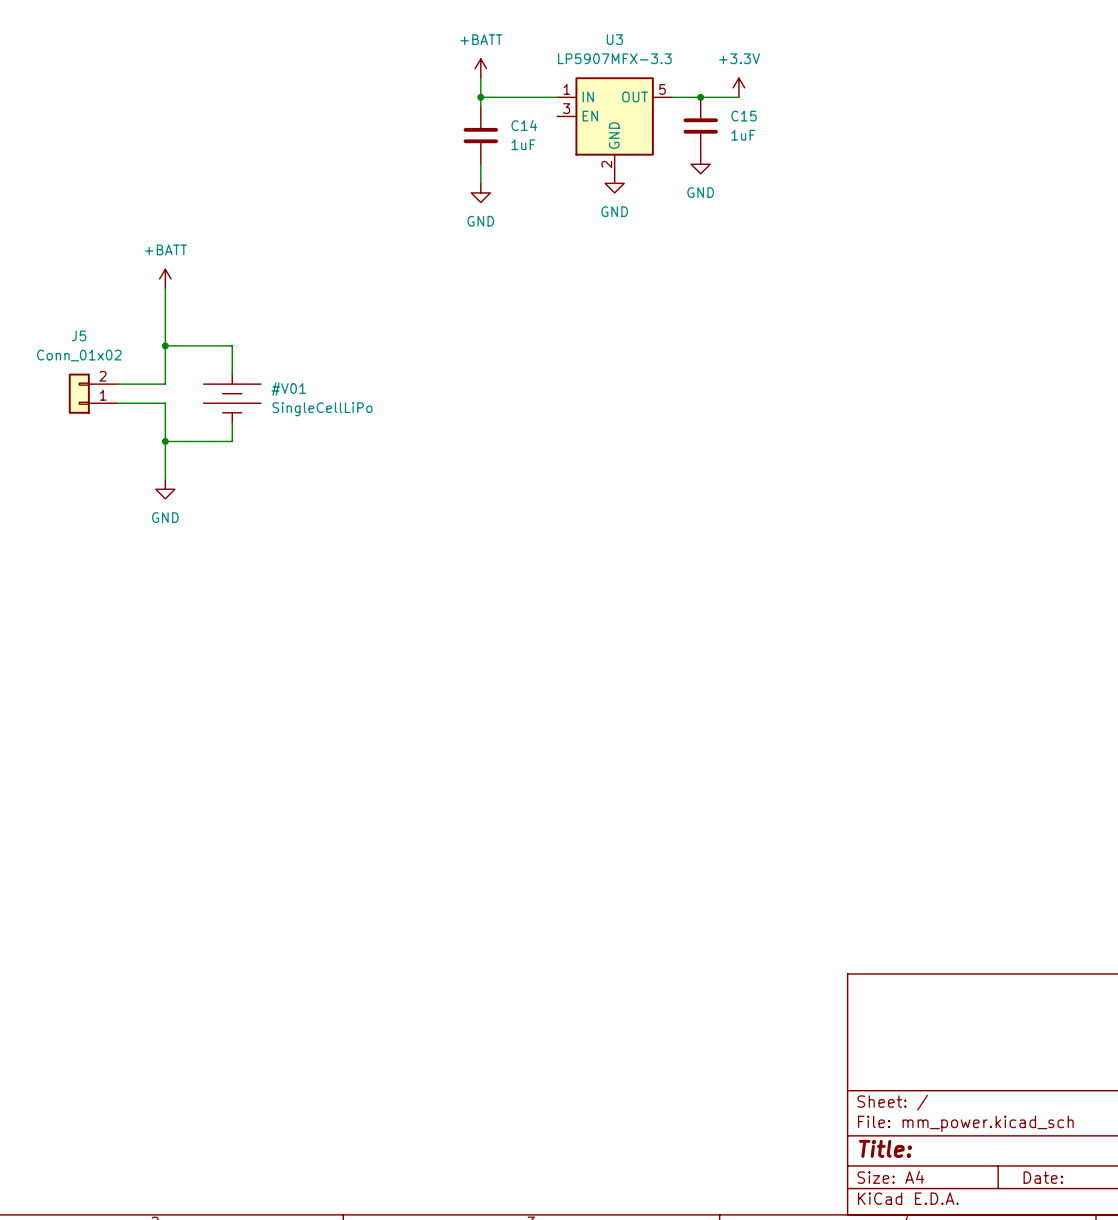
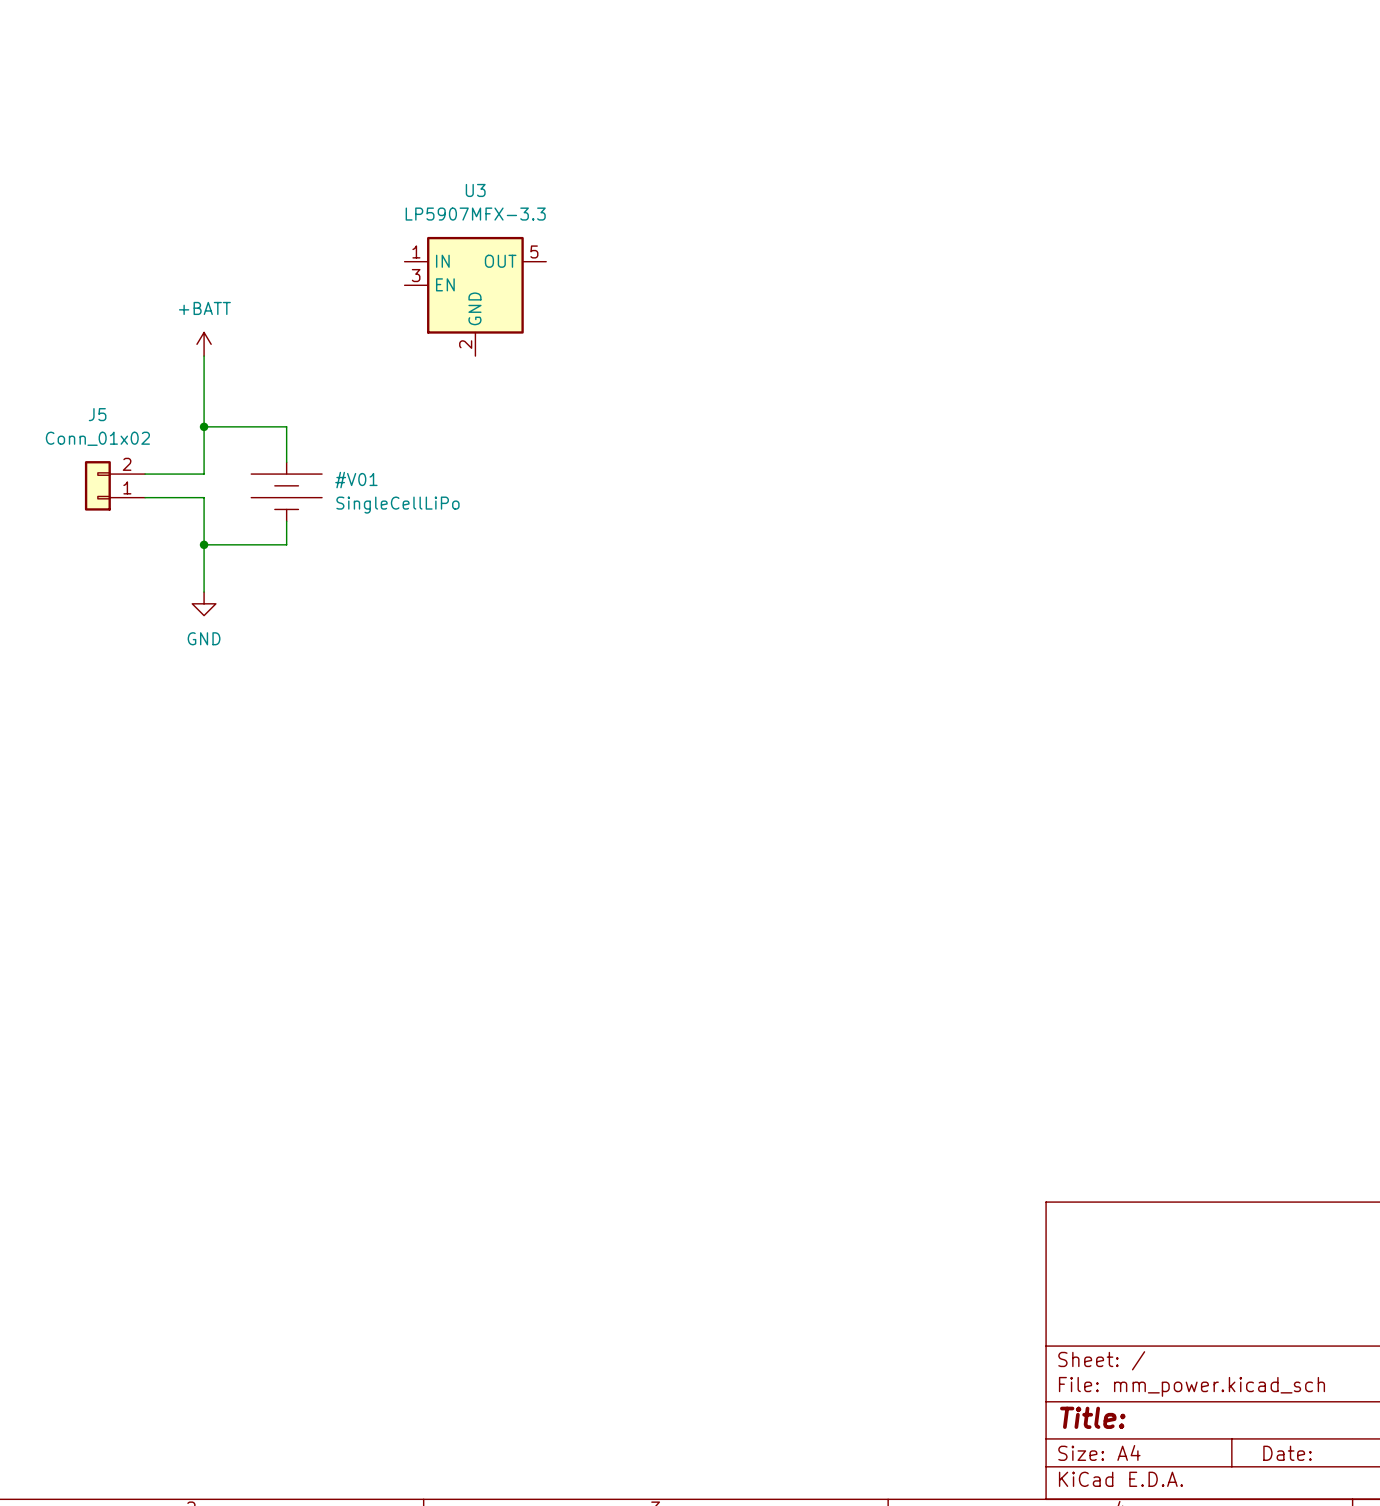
power symbol: +BATT (480, 68) -> none
wire: (480, 78) (480, 106) -> none
power symbol: +3.3V (738, 87) -> none
wire: (480, 97) (557, 97) -> none
junction: (480, 97) -> none
wire: (672, 97) (738, 97) -> none
junction: (700, 97) -> none
U3 position: (614, 125) -> (475, 296)
C15: 1uF (700, 126) -> none
C14: 1uF (480, 135) -> none
wire: (480, 164) (480, 183) -> none
power symbol: GND (700, 164) -> none
power symbol: GND (614, 183) -> none
power symbol: GND (480, 192) -> none

